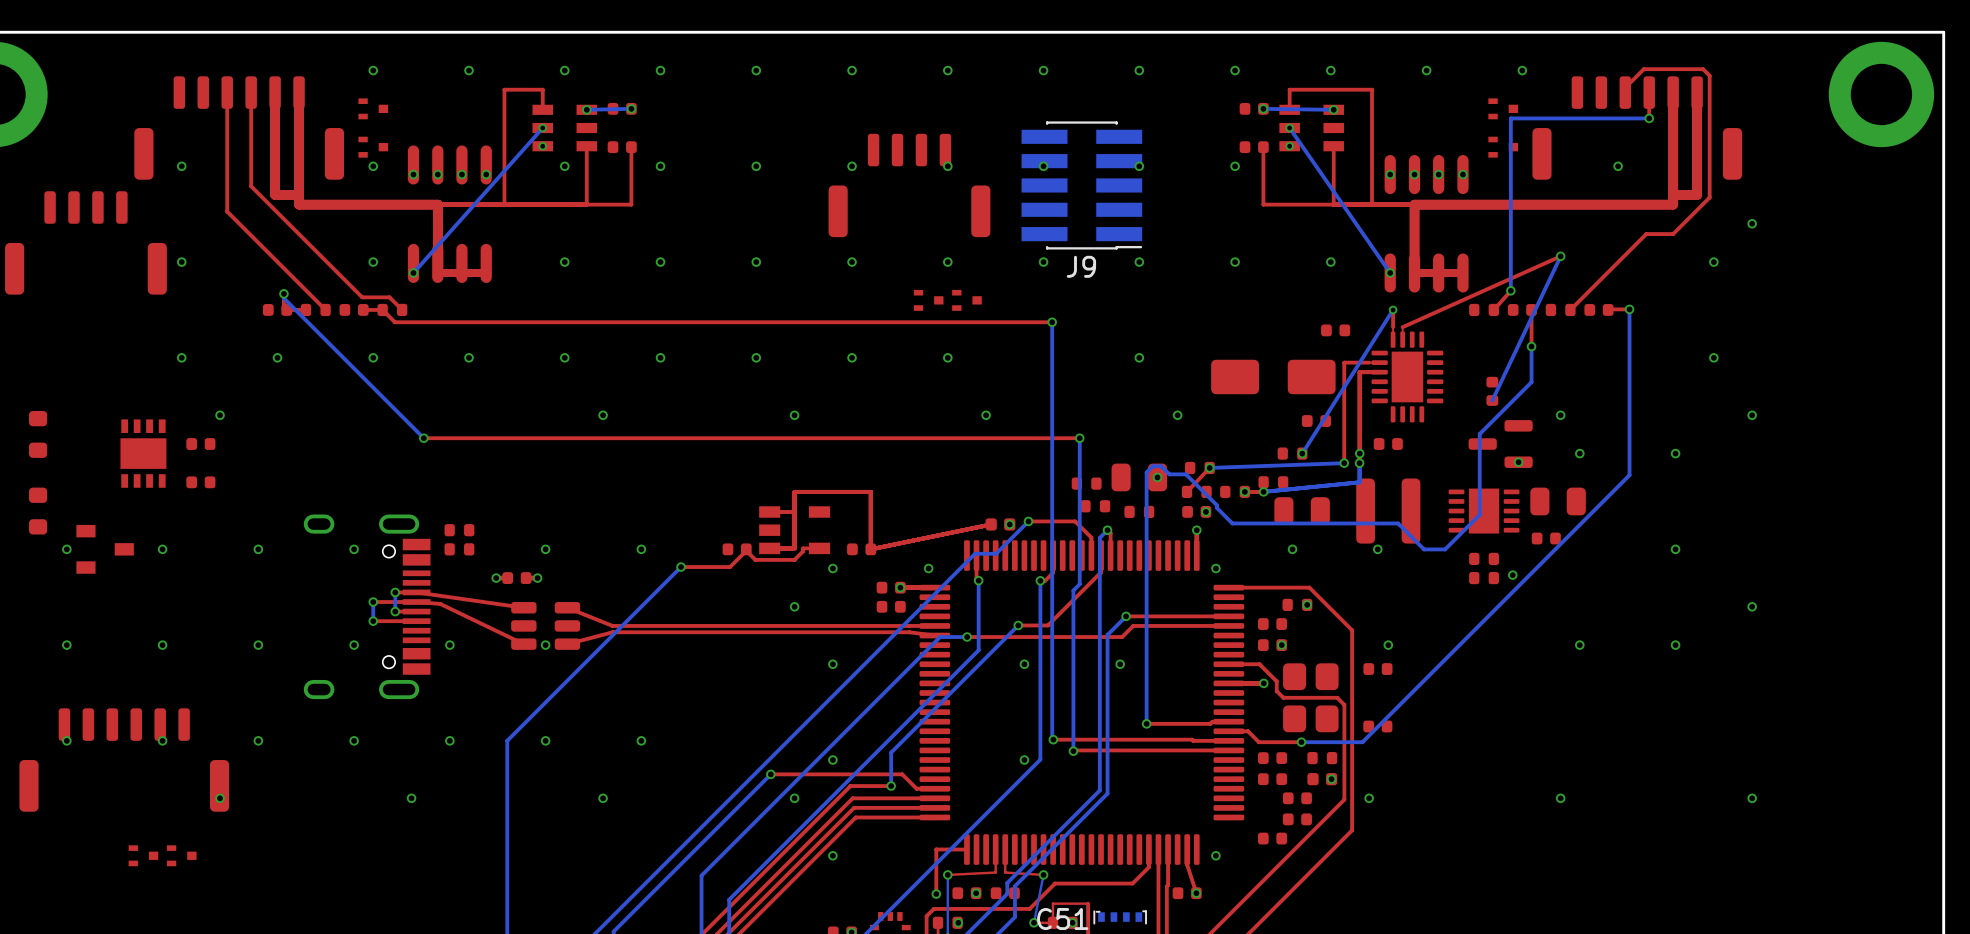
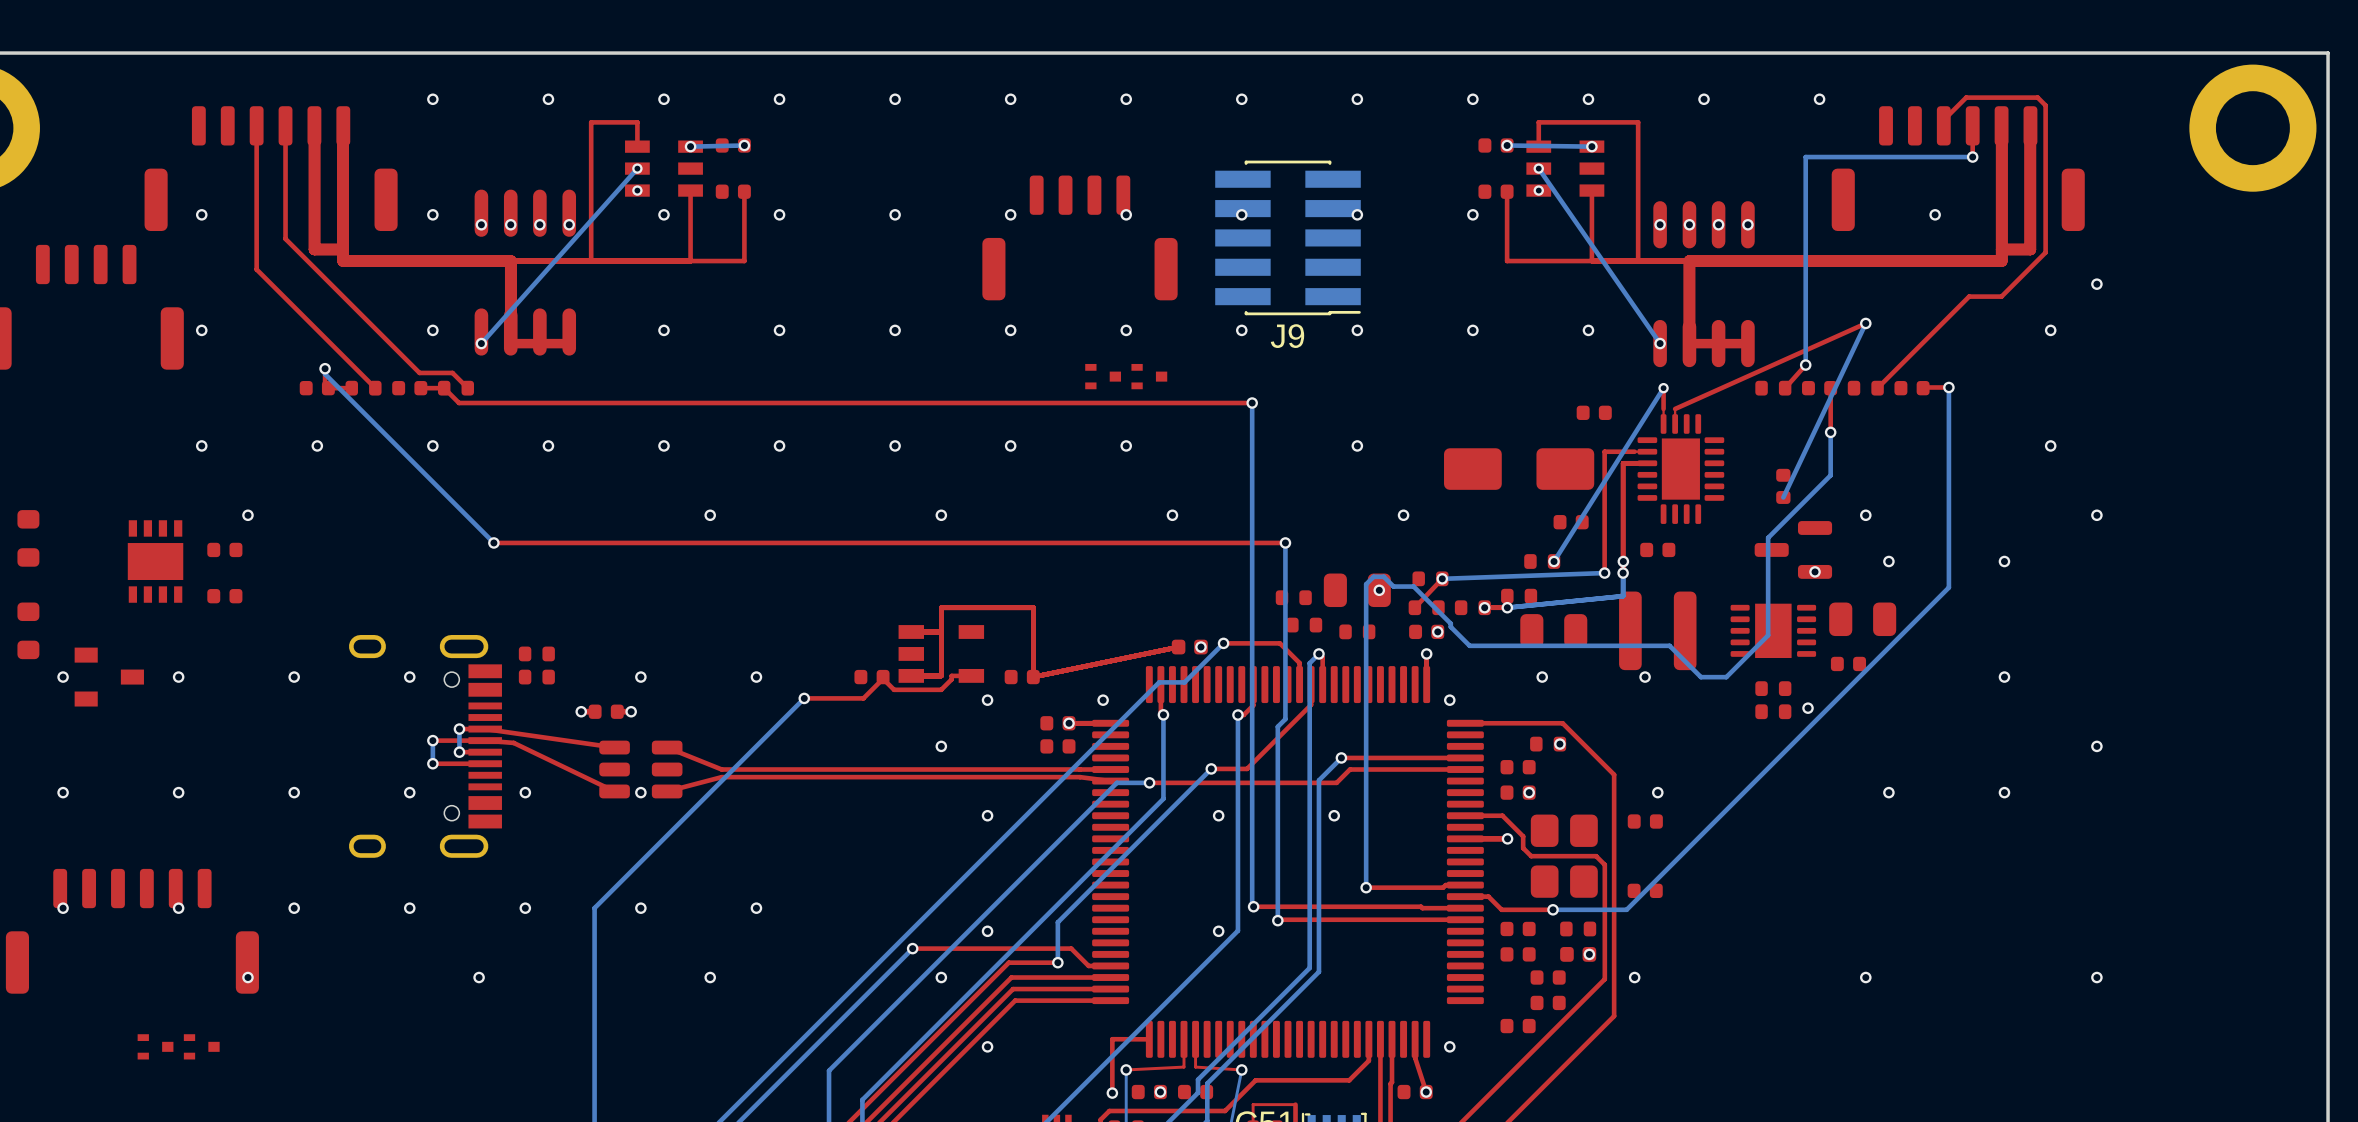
part: (373, 108) -> none
part: (1503, 108) -> none
part: (373, 147) -> none
part: (1503, 147) -> none

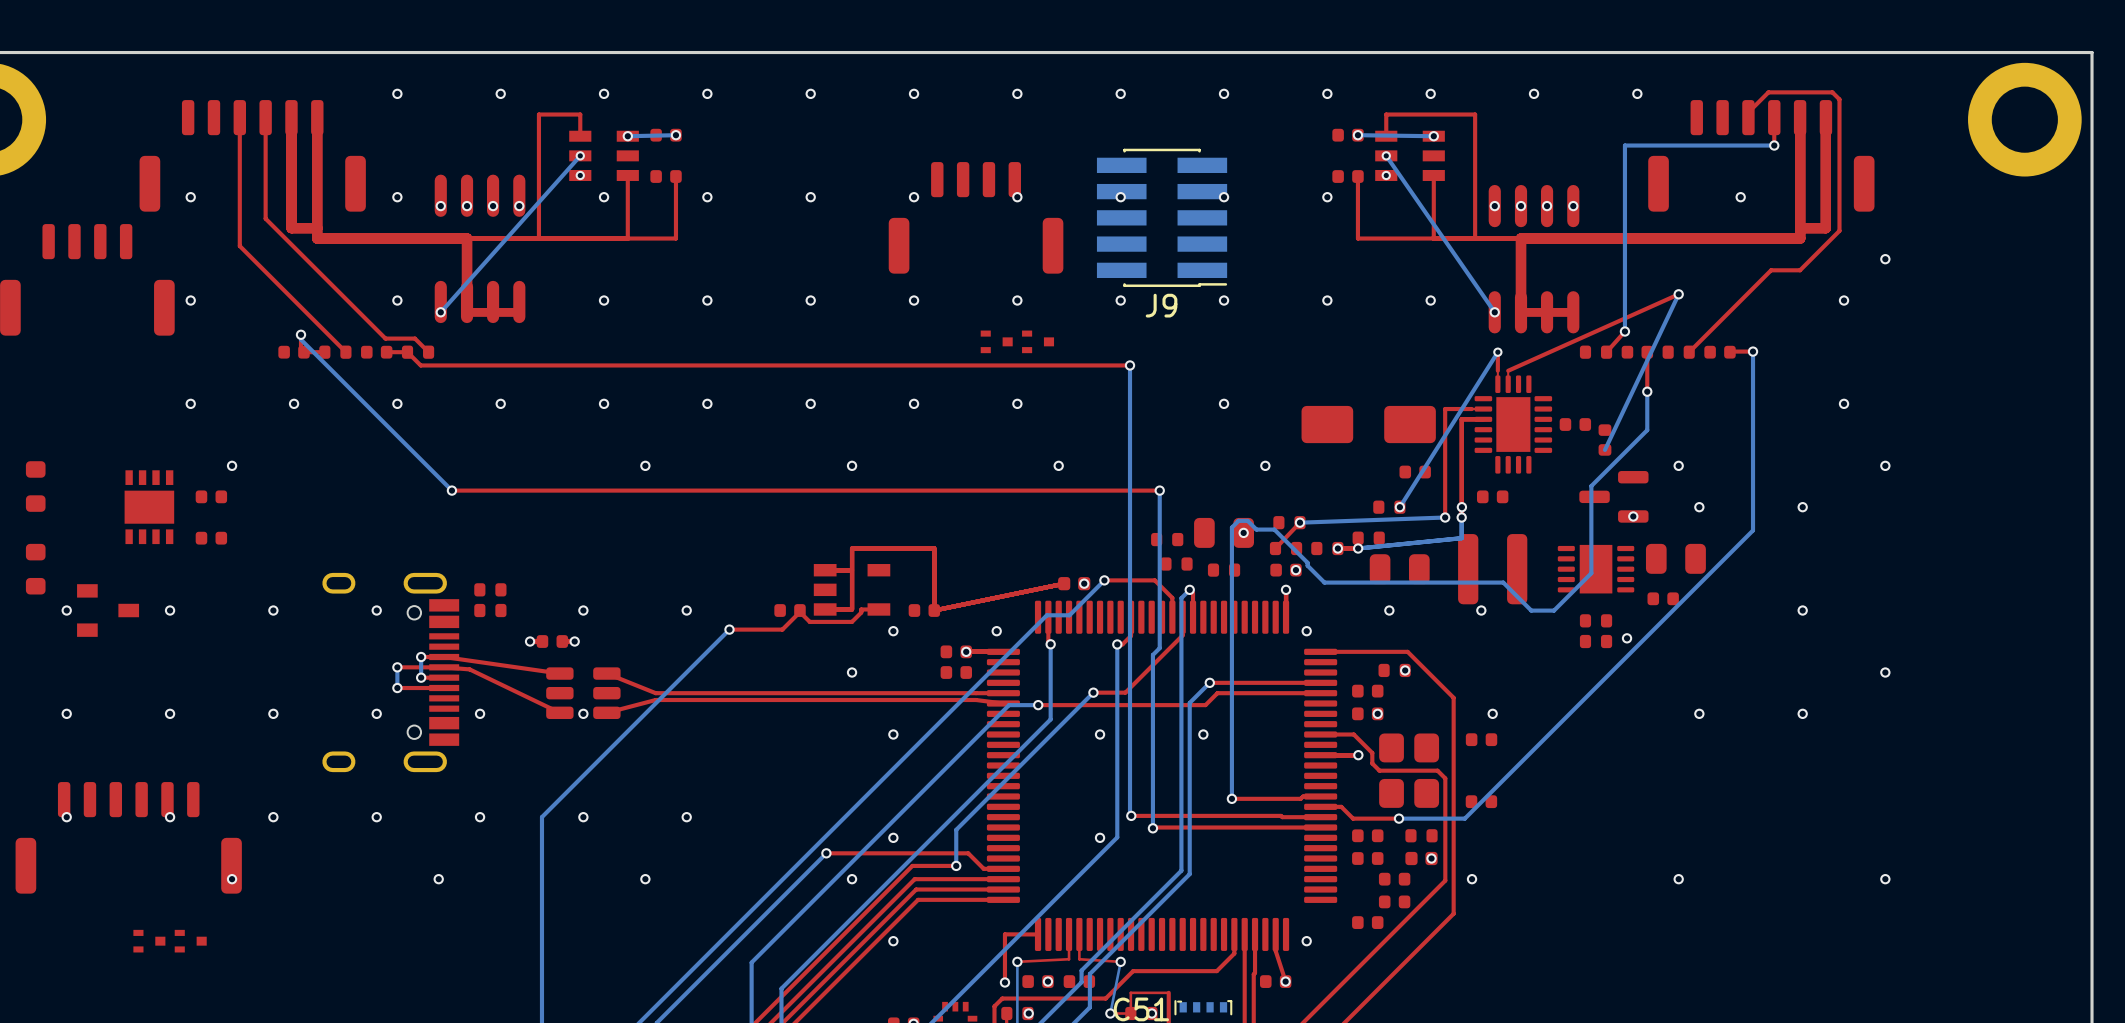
part position: (1594, 412) -> (1575, 424)

